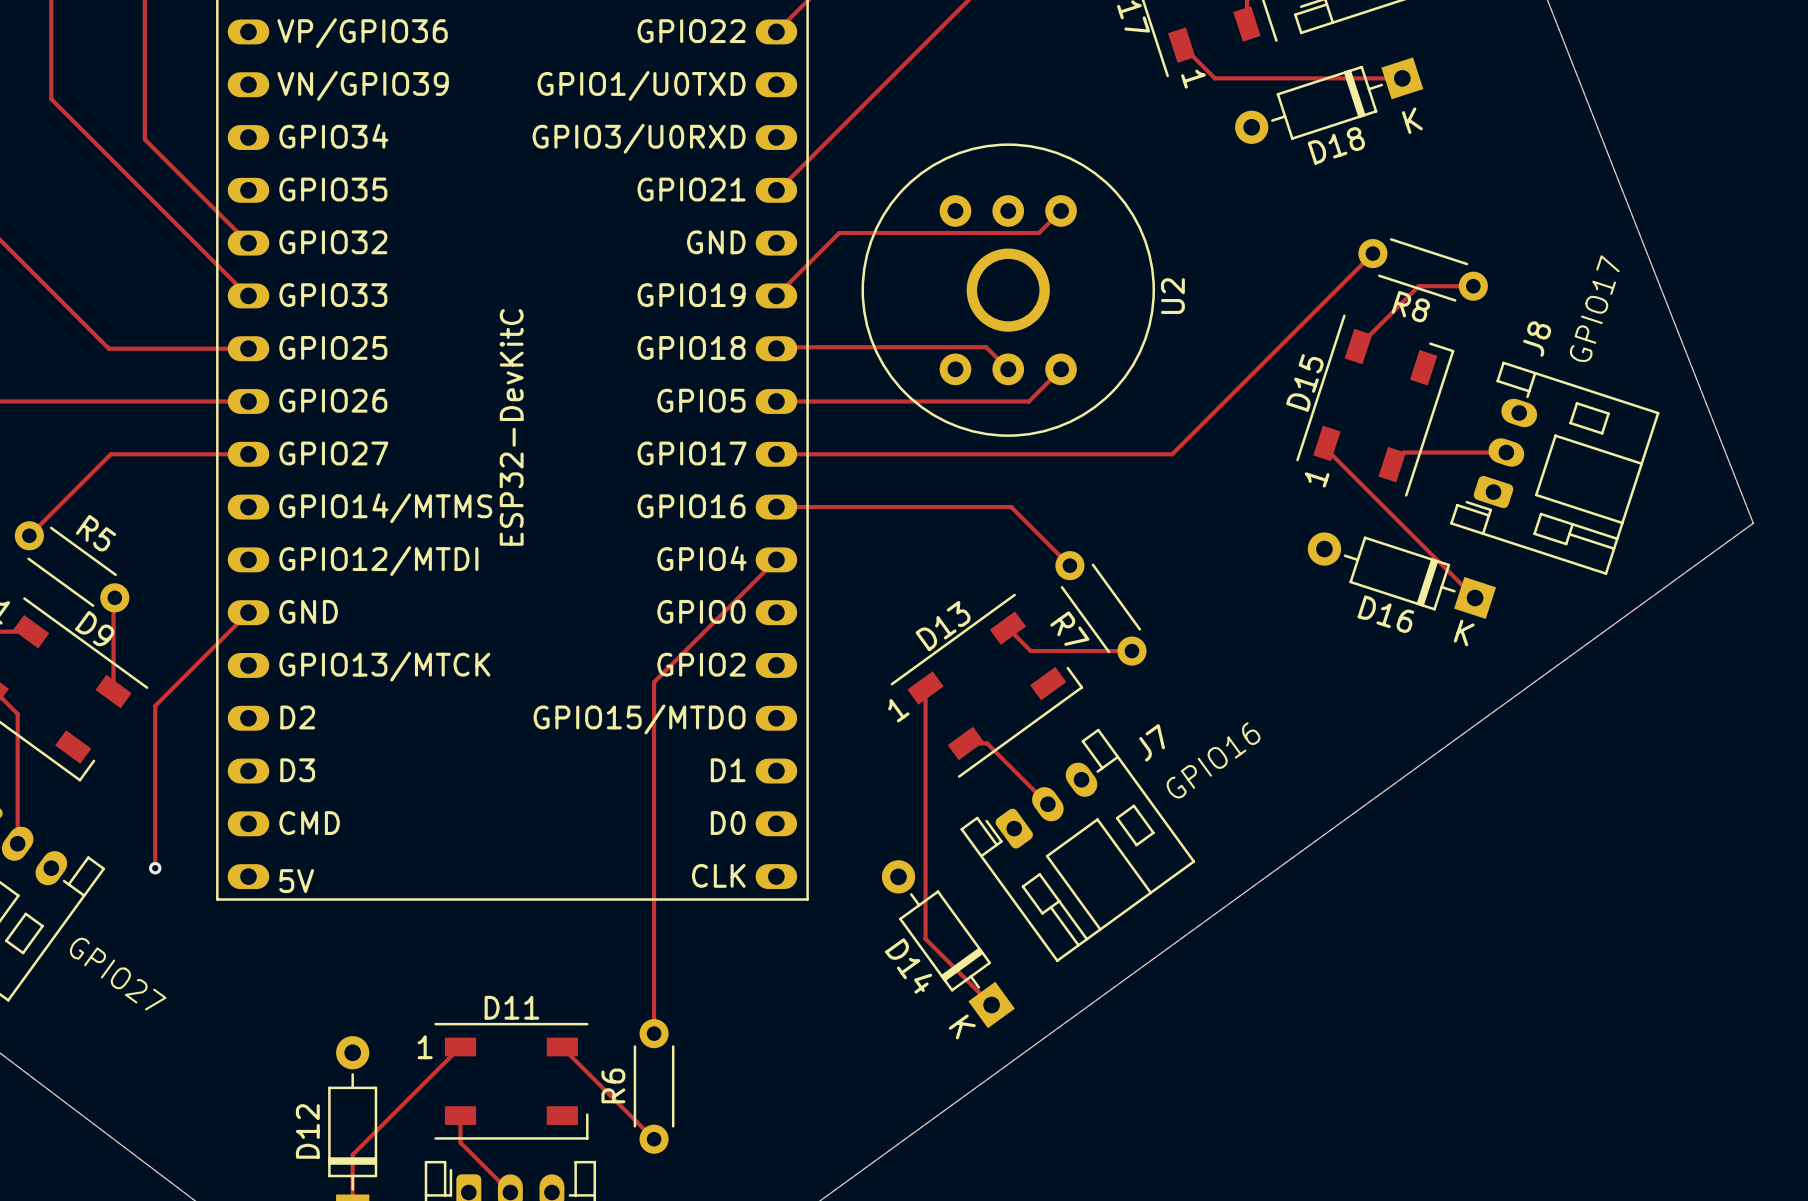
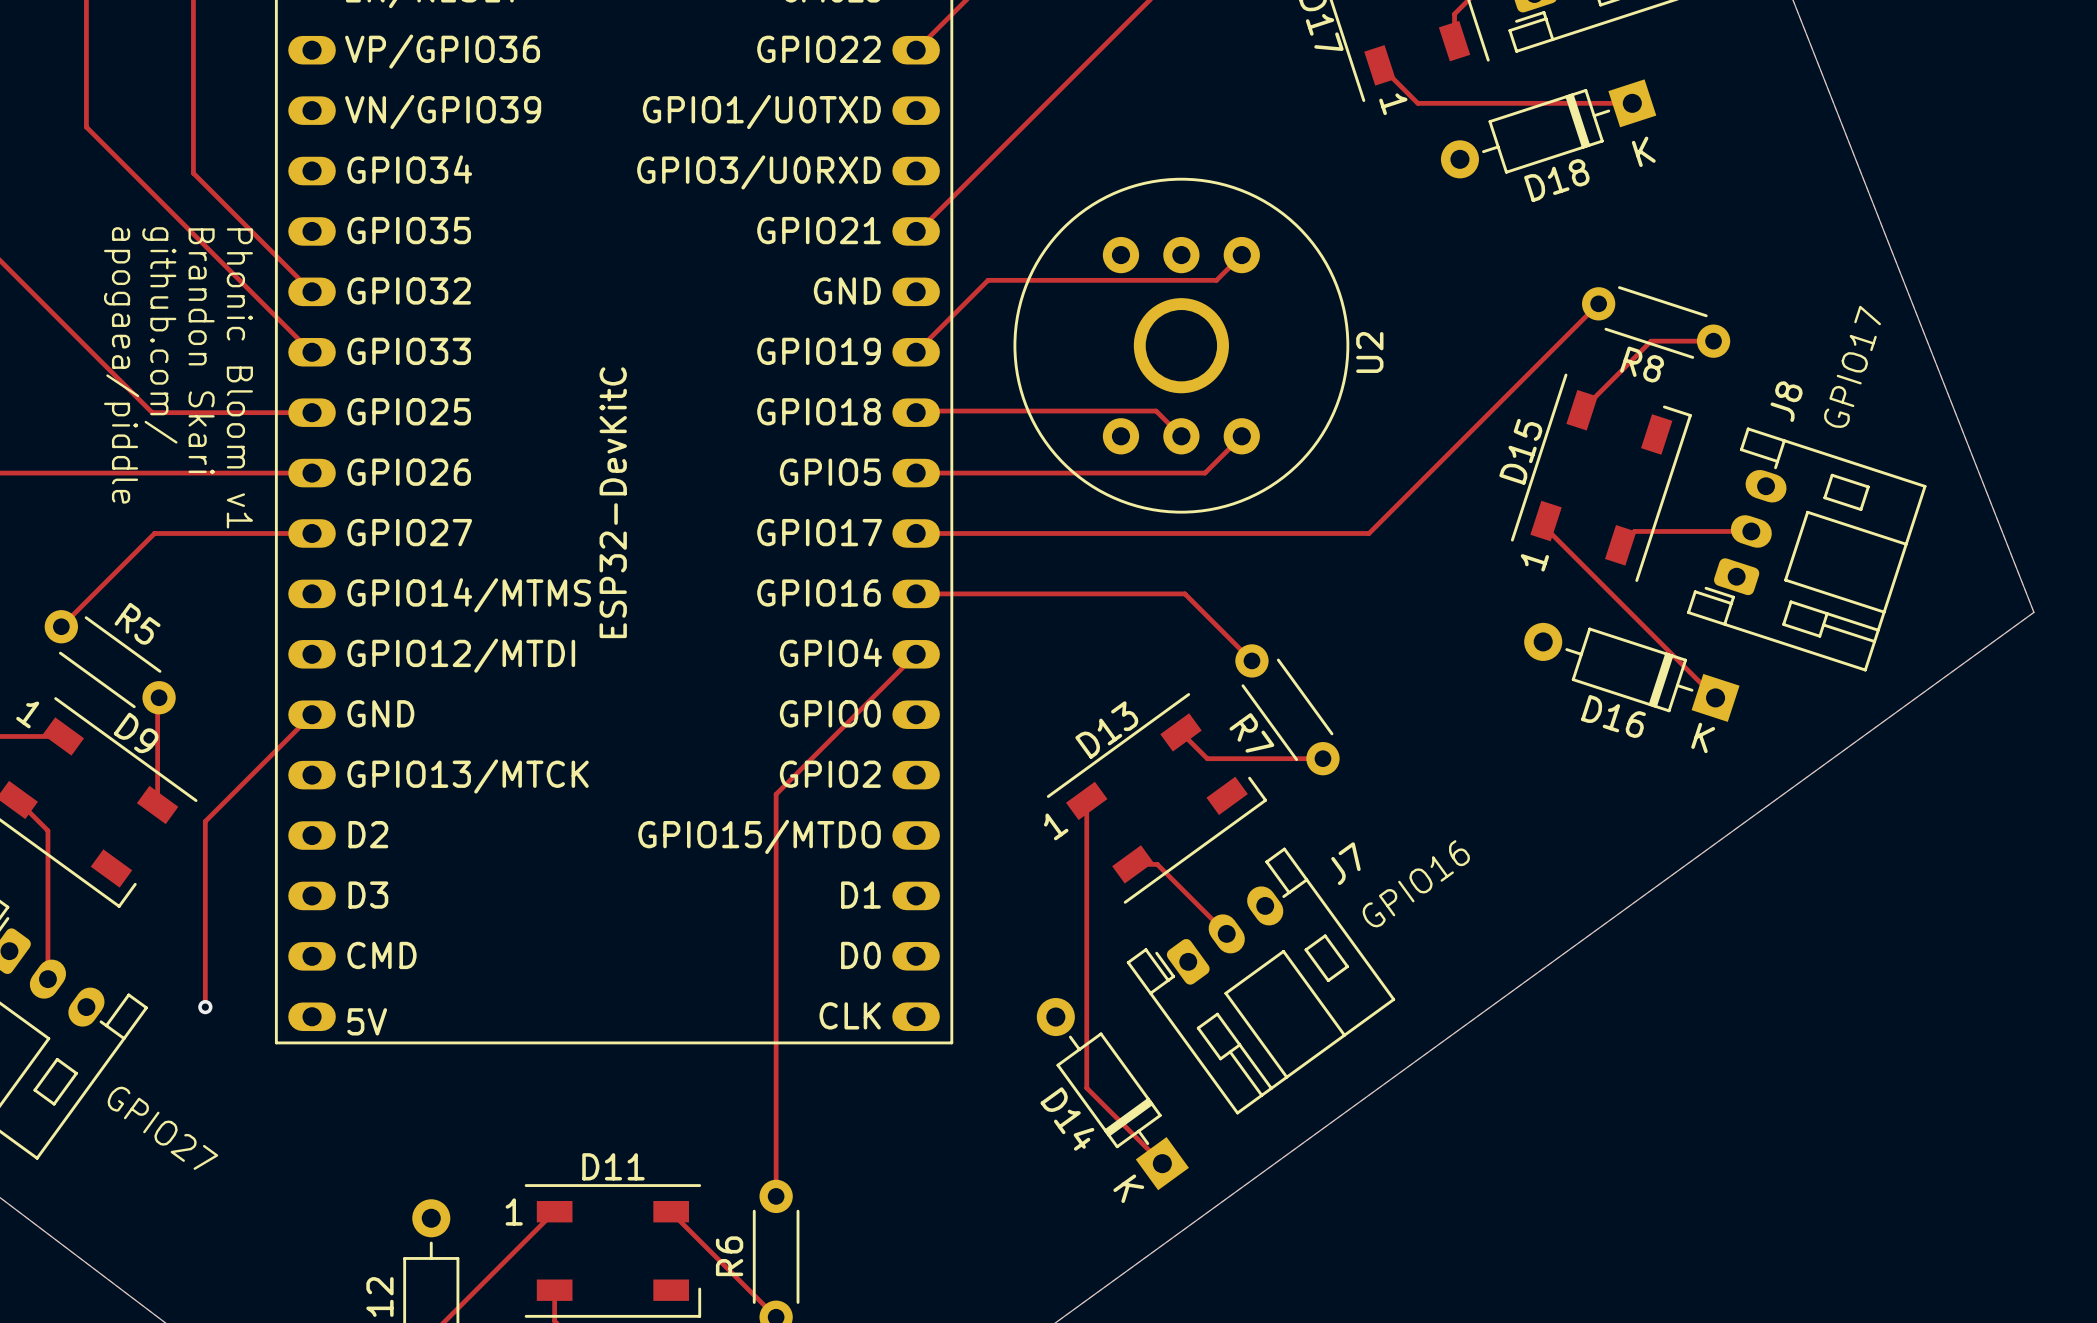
text: none -> github.com/ (159, 335)
text: none -> Brandon Skari (201, 351)
text: none -> apogaea/piddle (121, 365)
text: none -> Phonic Bloom v1 (239, 378)

